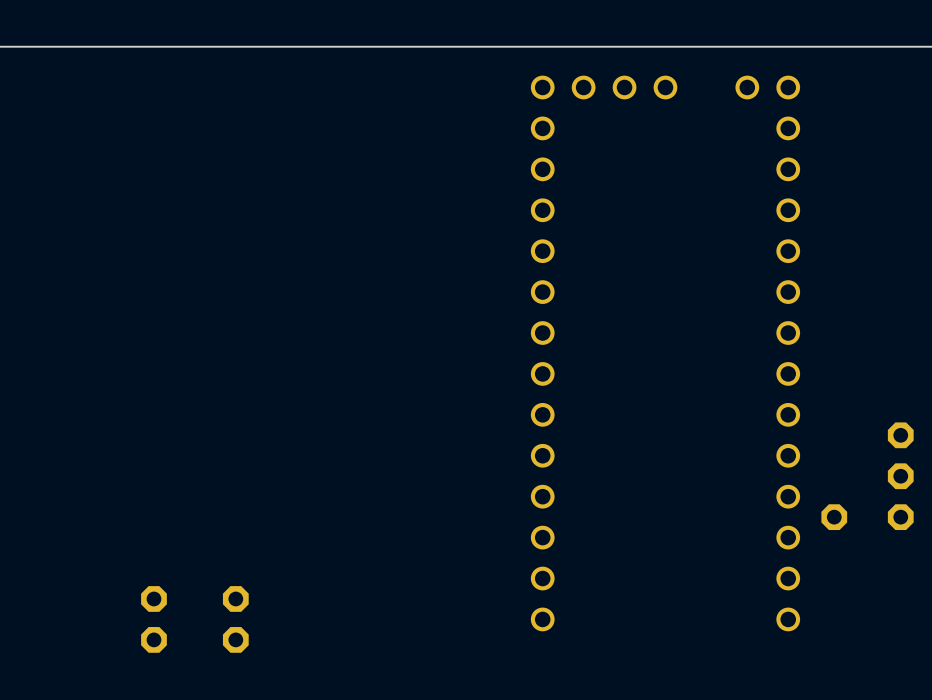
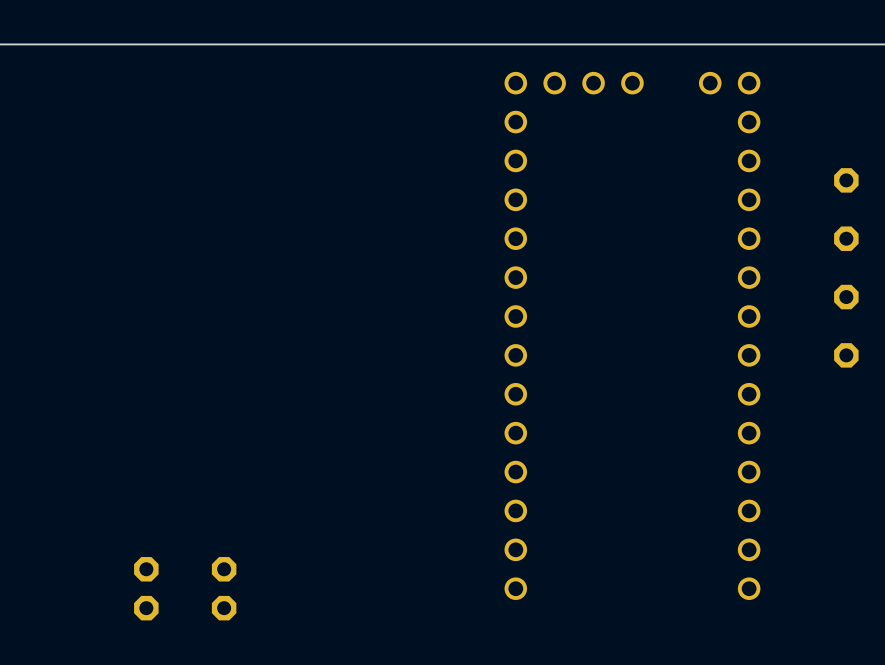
part: none -> (846, 180)
part: none -> (846, 238)
part: none -> (846, 297)
part: none -> (846, 355)
part: (900, 435) -> none
part: (900, 476) -> none
part: (834, 517) -> none
part: (900, 517) -> none

